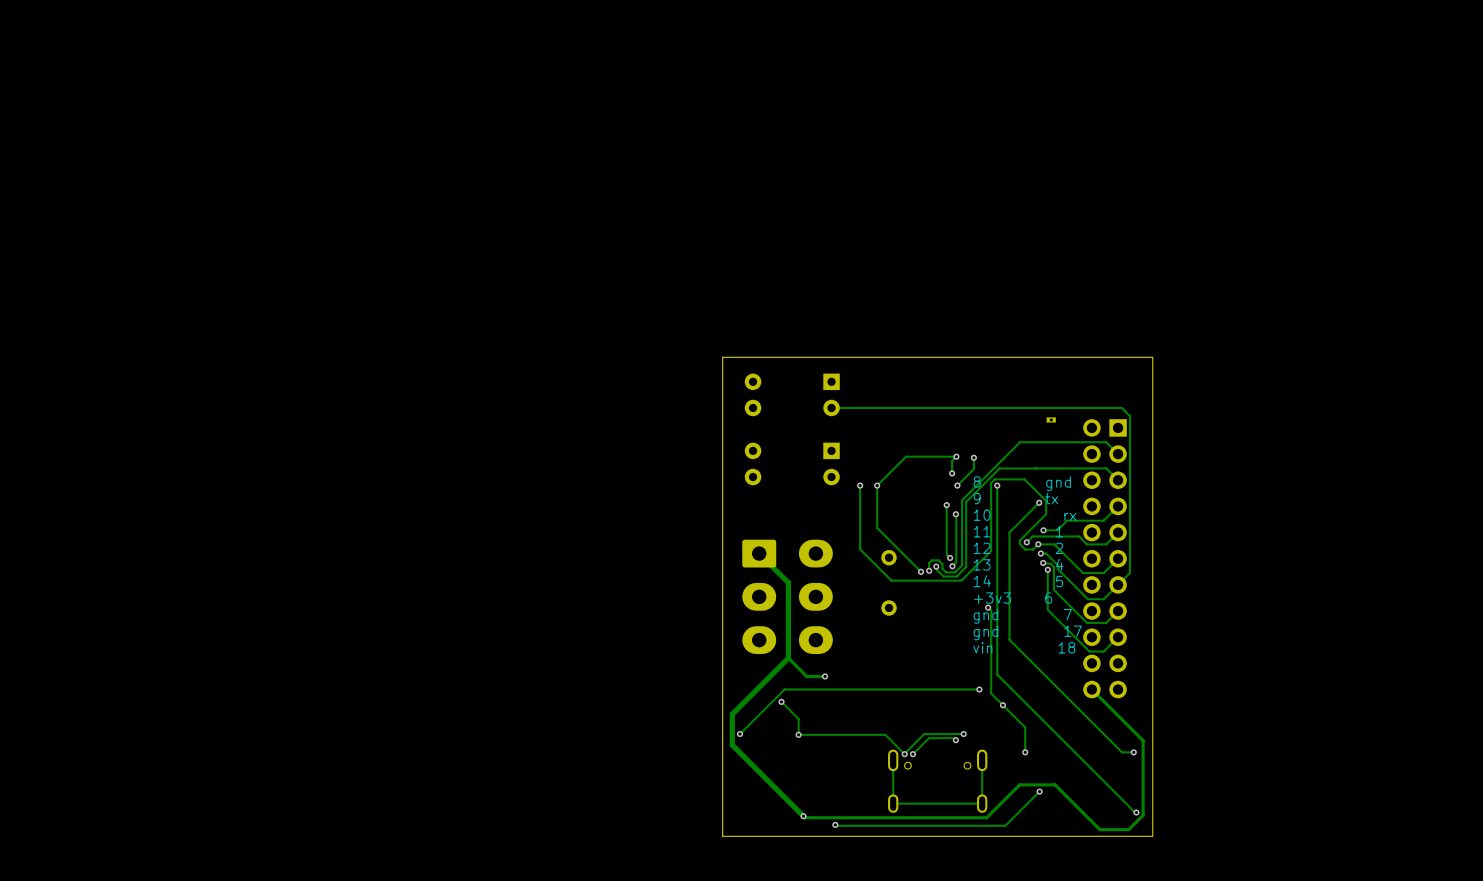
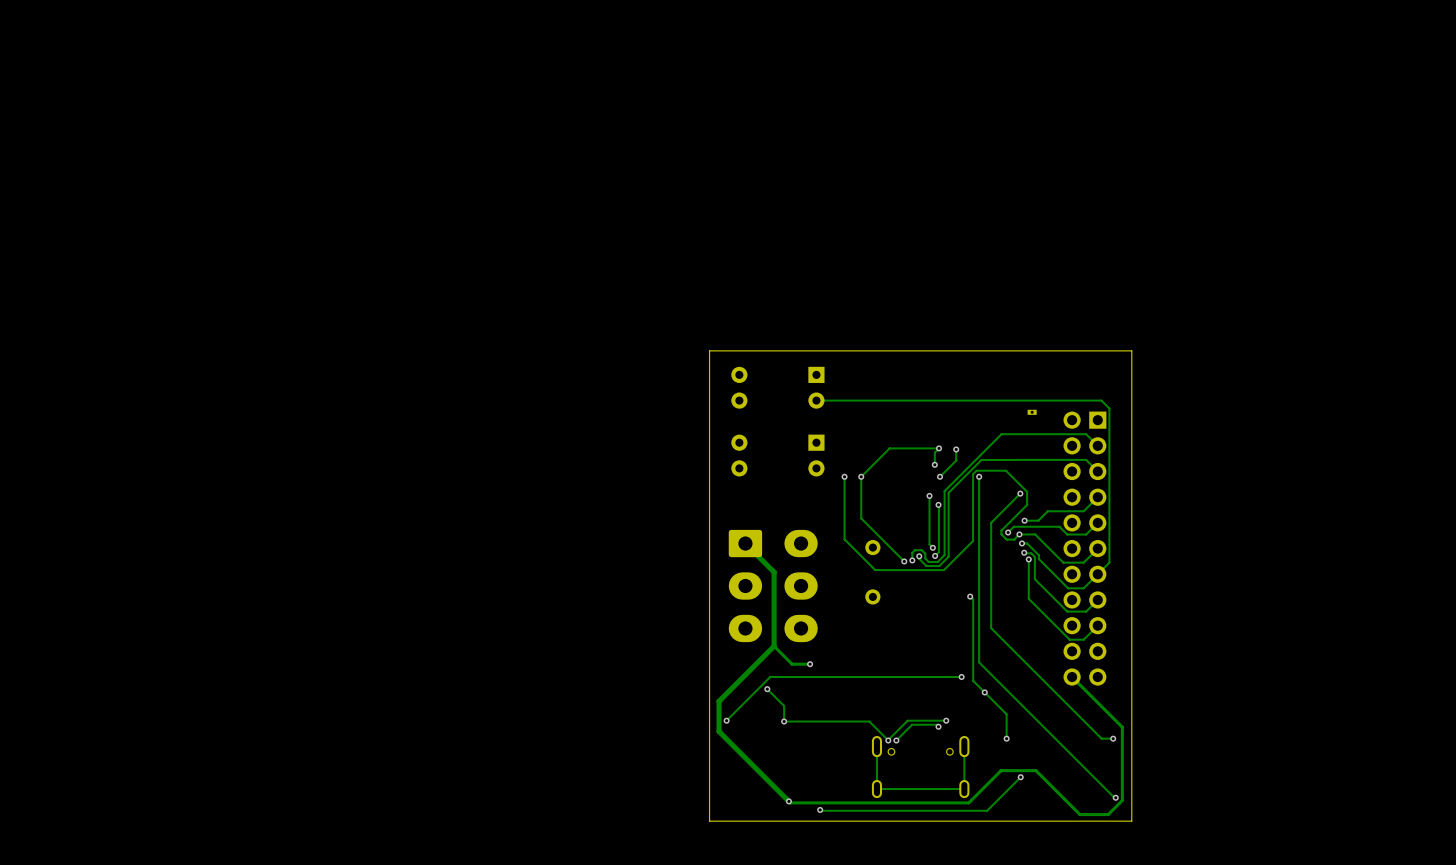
text: 8 gnd (1022, 483) -> none
text: 9 tx (1015, 498) -> none
text: 10 rx (1024, 515) -> none
text: 11 1 (1018, 531) -> none
text: 12 2 (1018, 548) -> none
text: 13 4 (1018, 564) -> none
text: 14 5 (1018, 581) -> none
text: +3v3 6 (1013, 598) -> none
text: gnd 7 (1022, 616) -> none
text: gnd 17 (1027, 632) -> none
text: vin 18 (1024, 647) -> none

